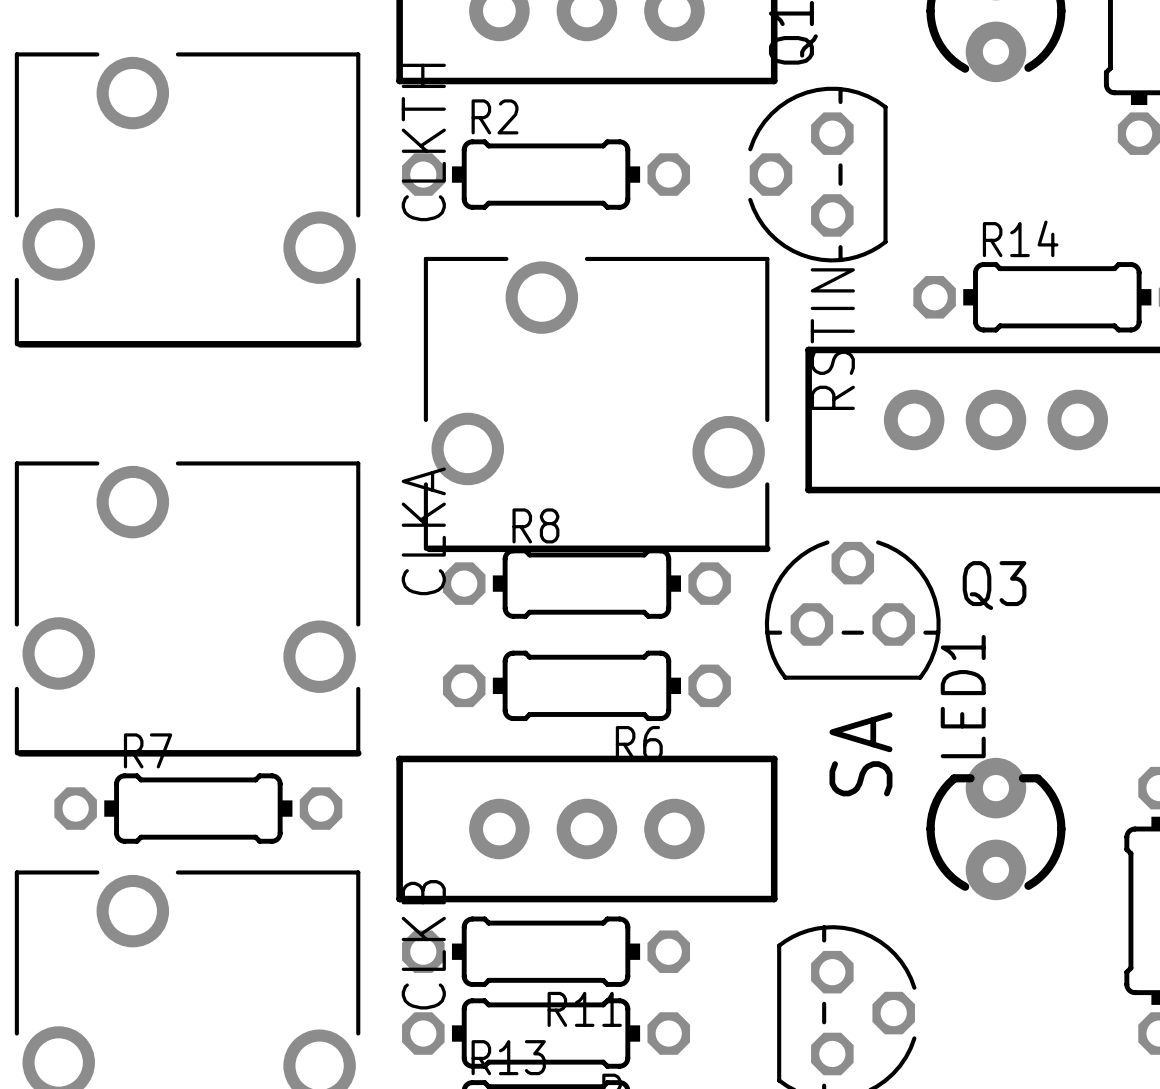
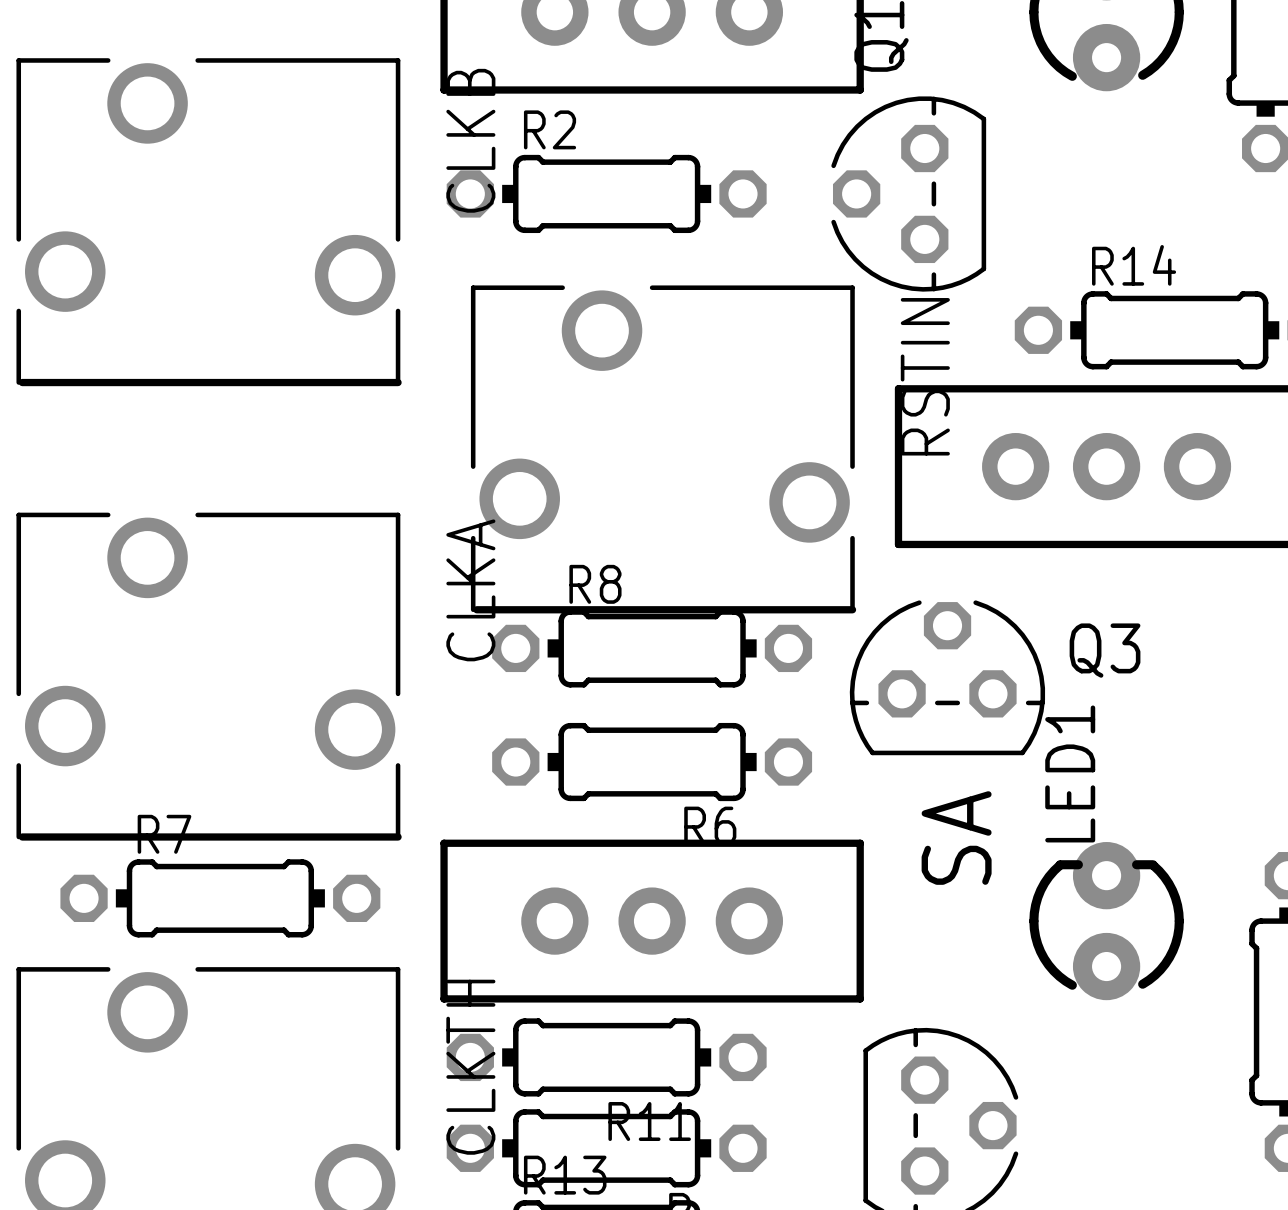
CLKTH name: CLKTH (423, 142) -> CLKB (470, 140)
CLKB name: CLKB (423, 944) -> CLKTH (470, 1067)

